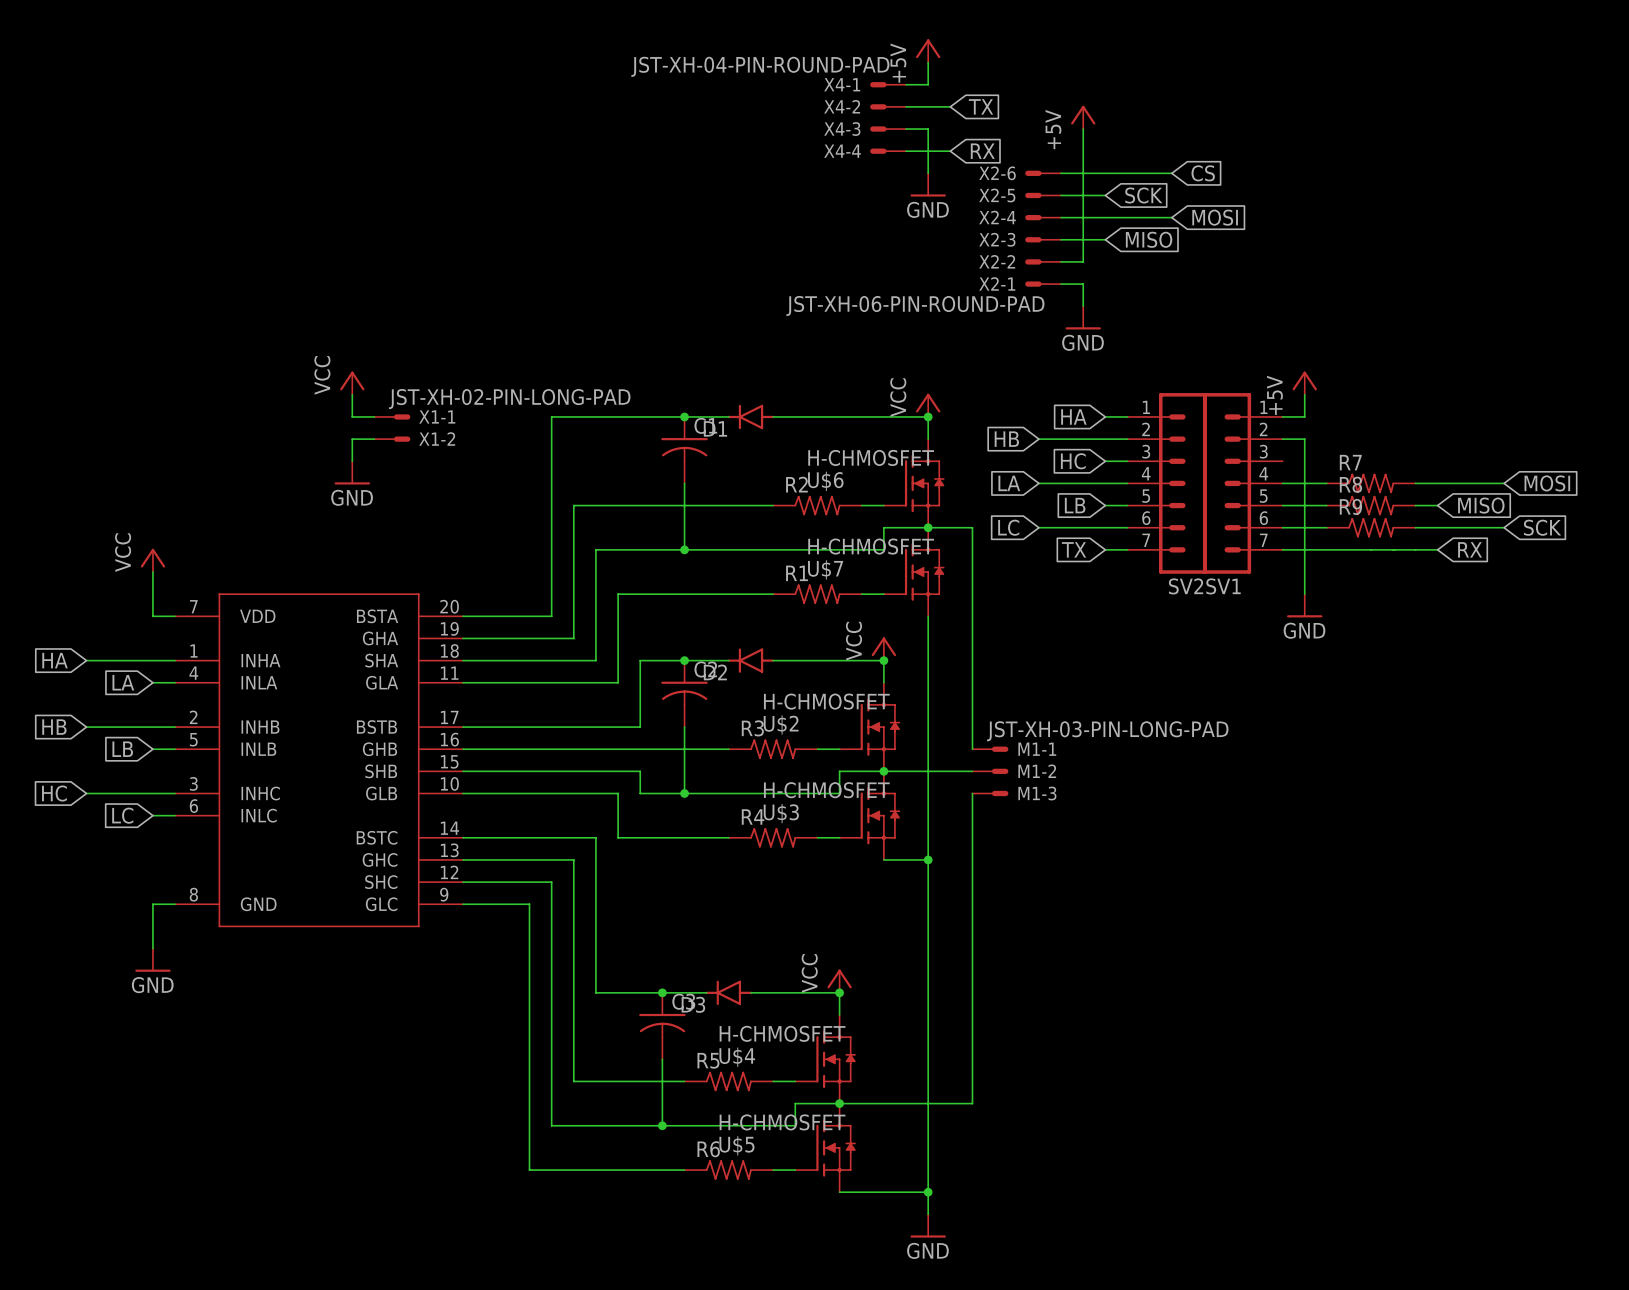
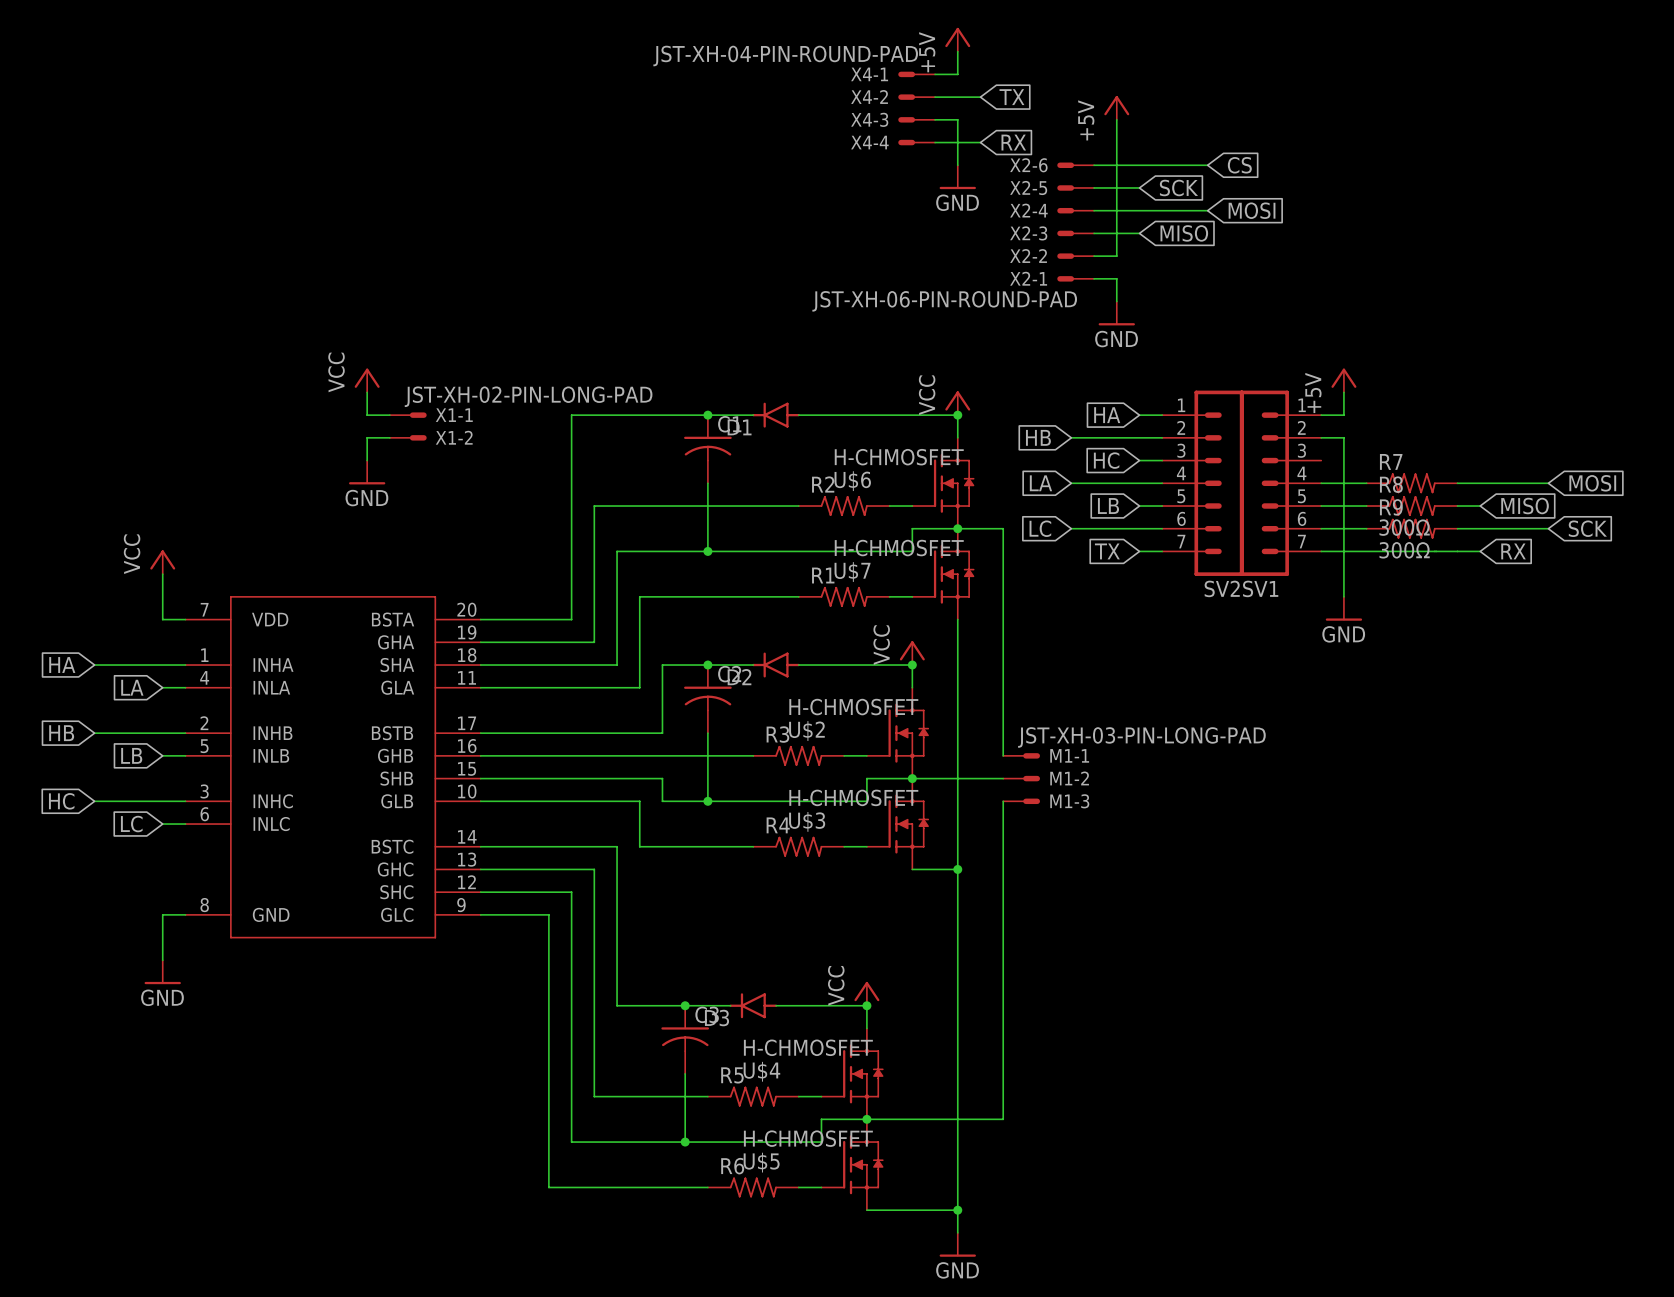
R8 value: none -> 300Ω (1404, 527)
R9 value: none -> 300Ω (1404, 550)

